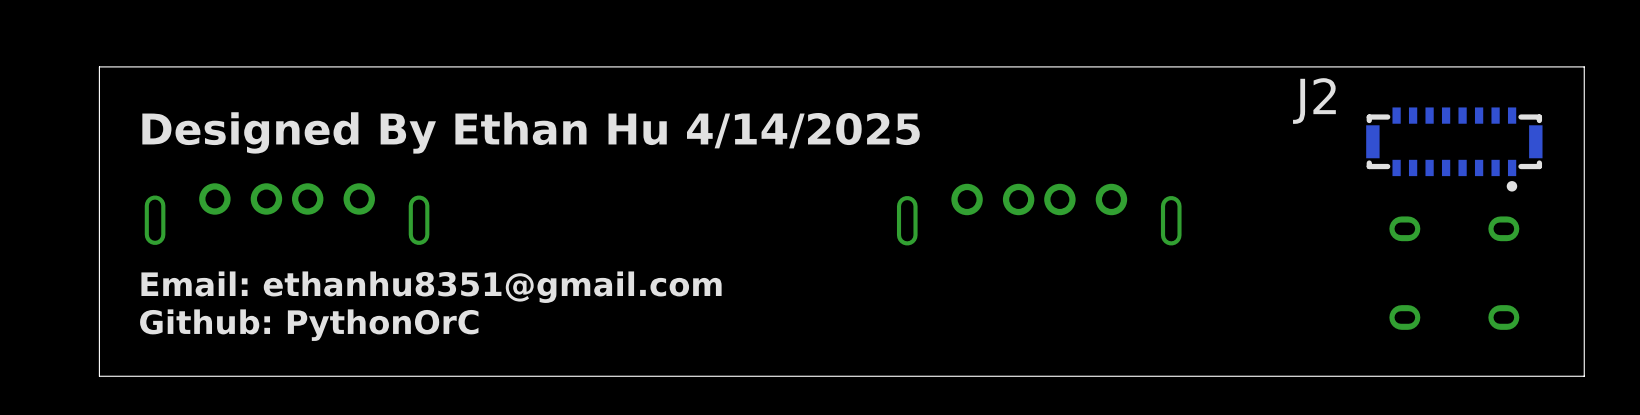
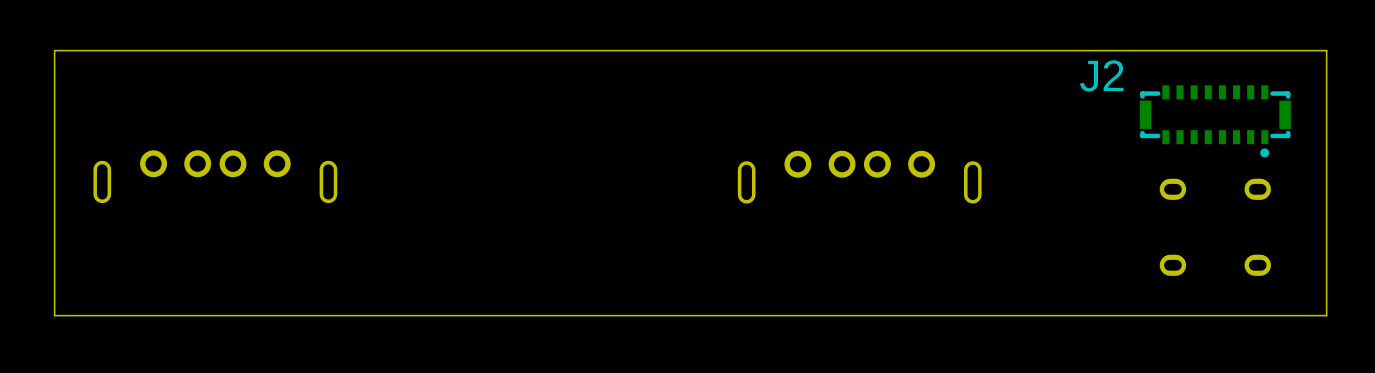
text: Designed By Ethan Hu 4/14/2025 (531, 132) -> none
text: Email: ethanhu8351@gmail.com (431, 287) -> none
text: Github: PythonOrC (309, 325) -> none

